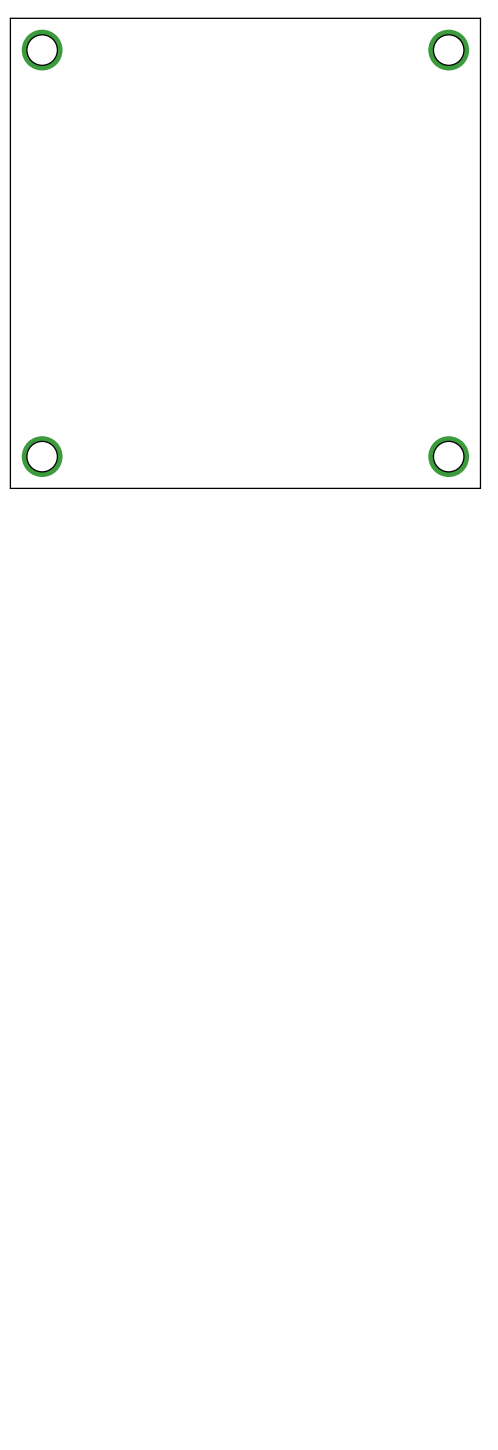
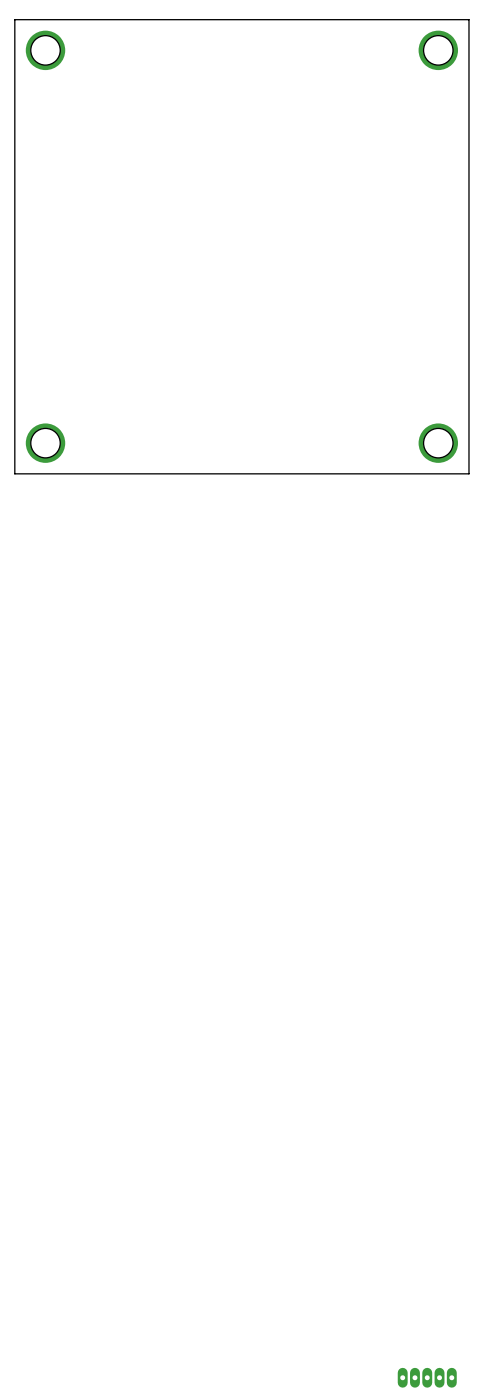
part: none -> (427, 1377)

